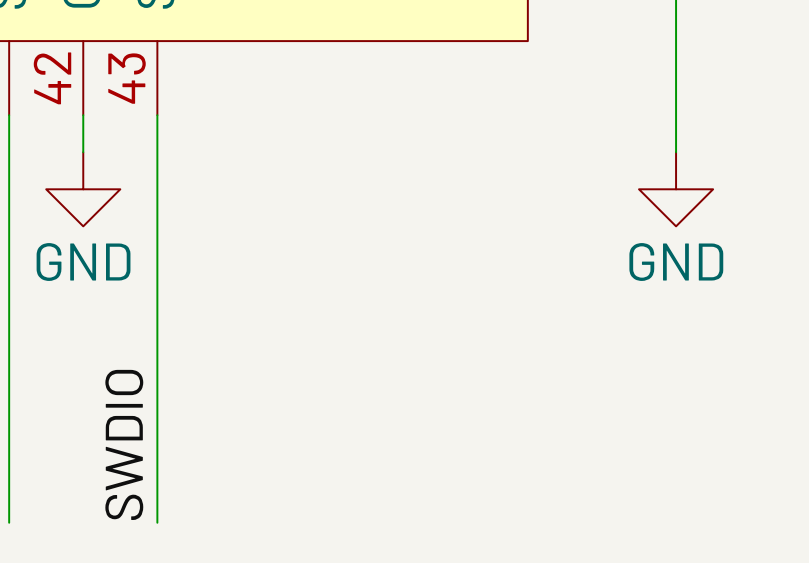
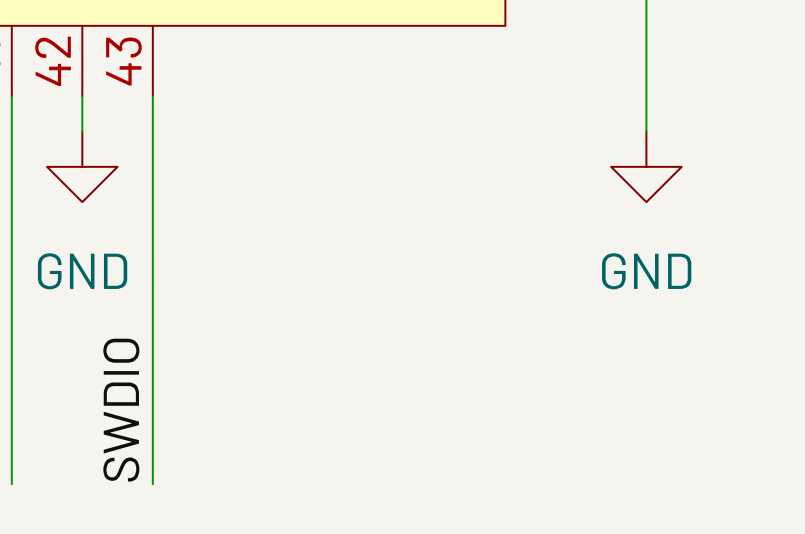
power symbol text position: GND (83, 262) -> GND (82, 271)
power symbol text position: GND (676, 262) -> GND (646, 271)

